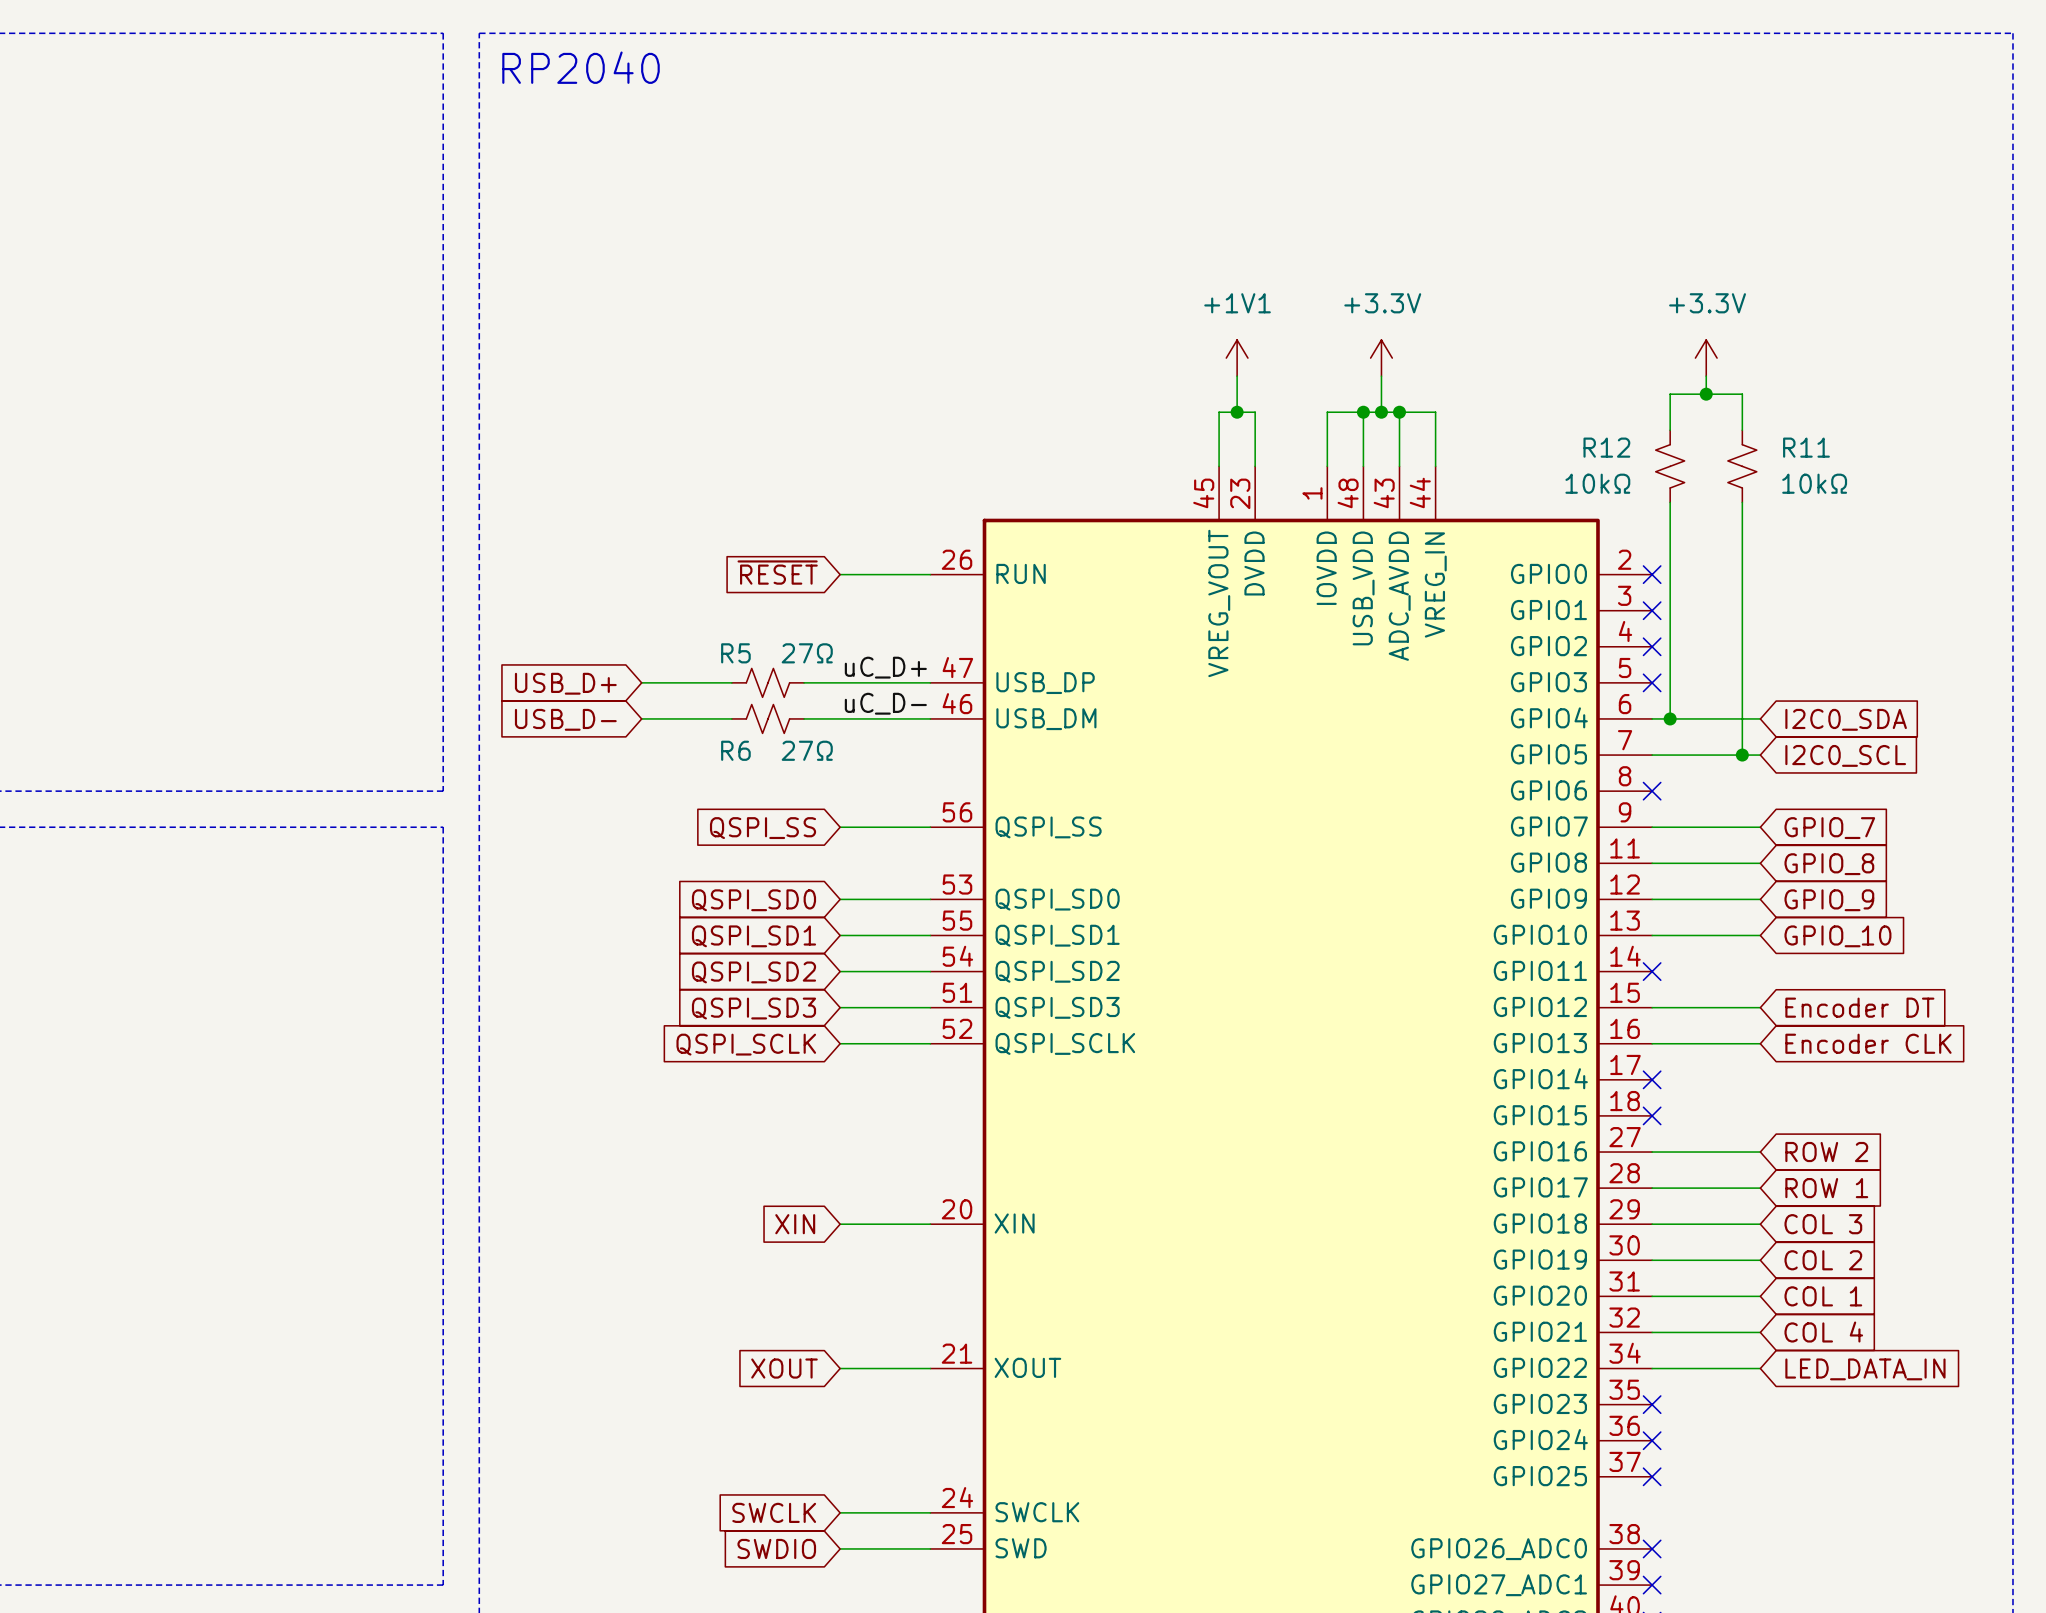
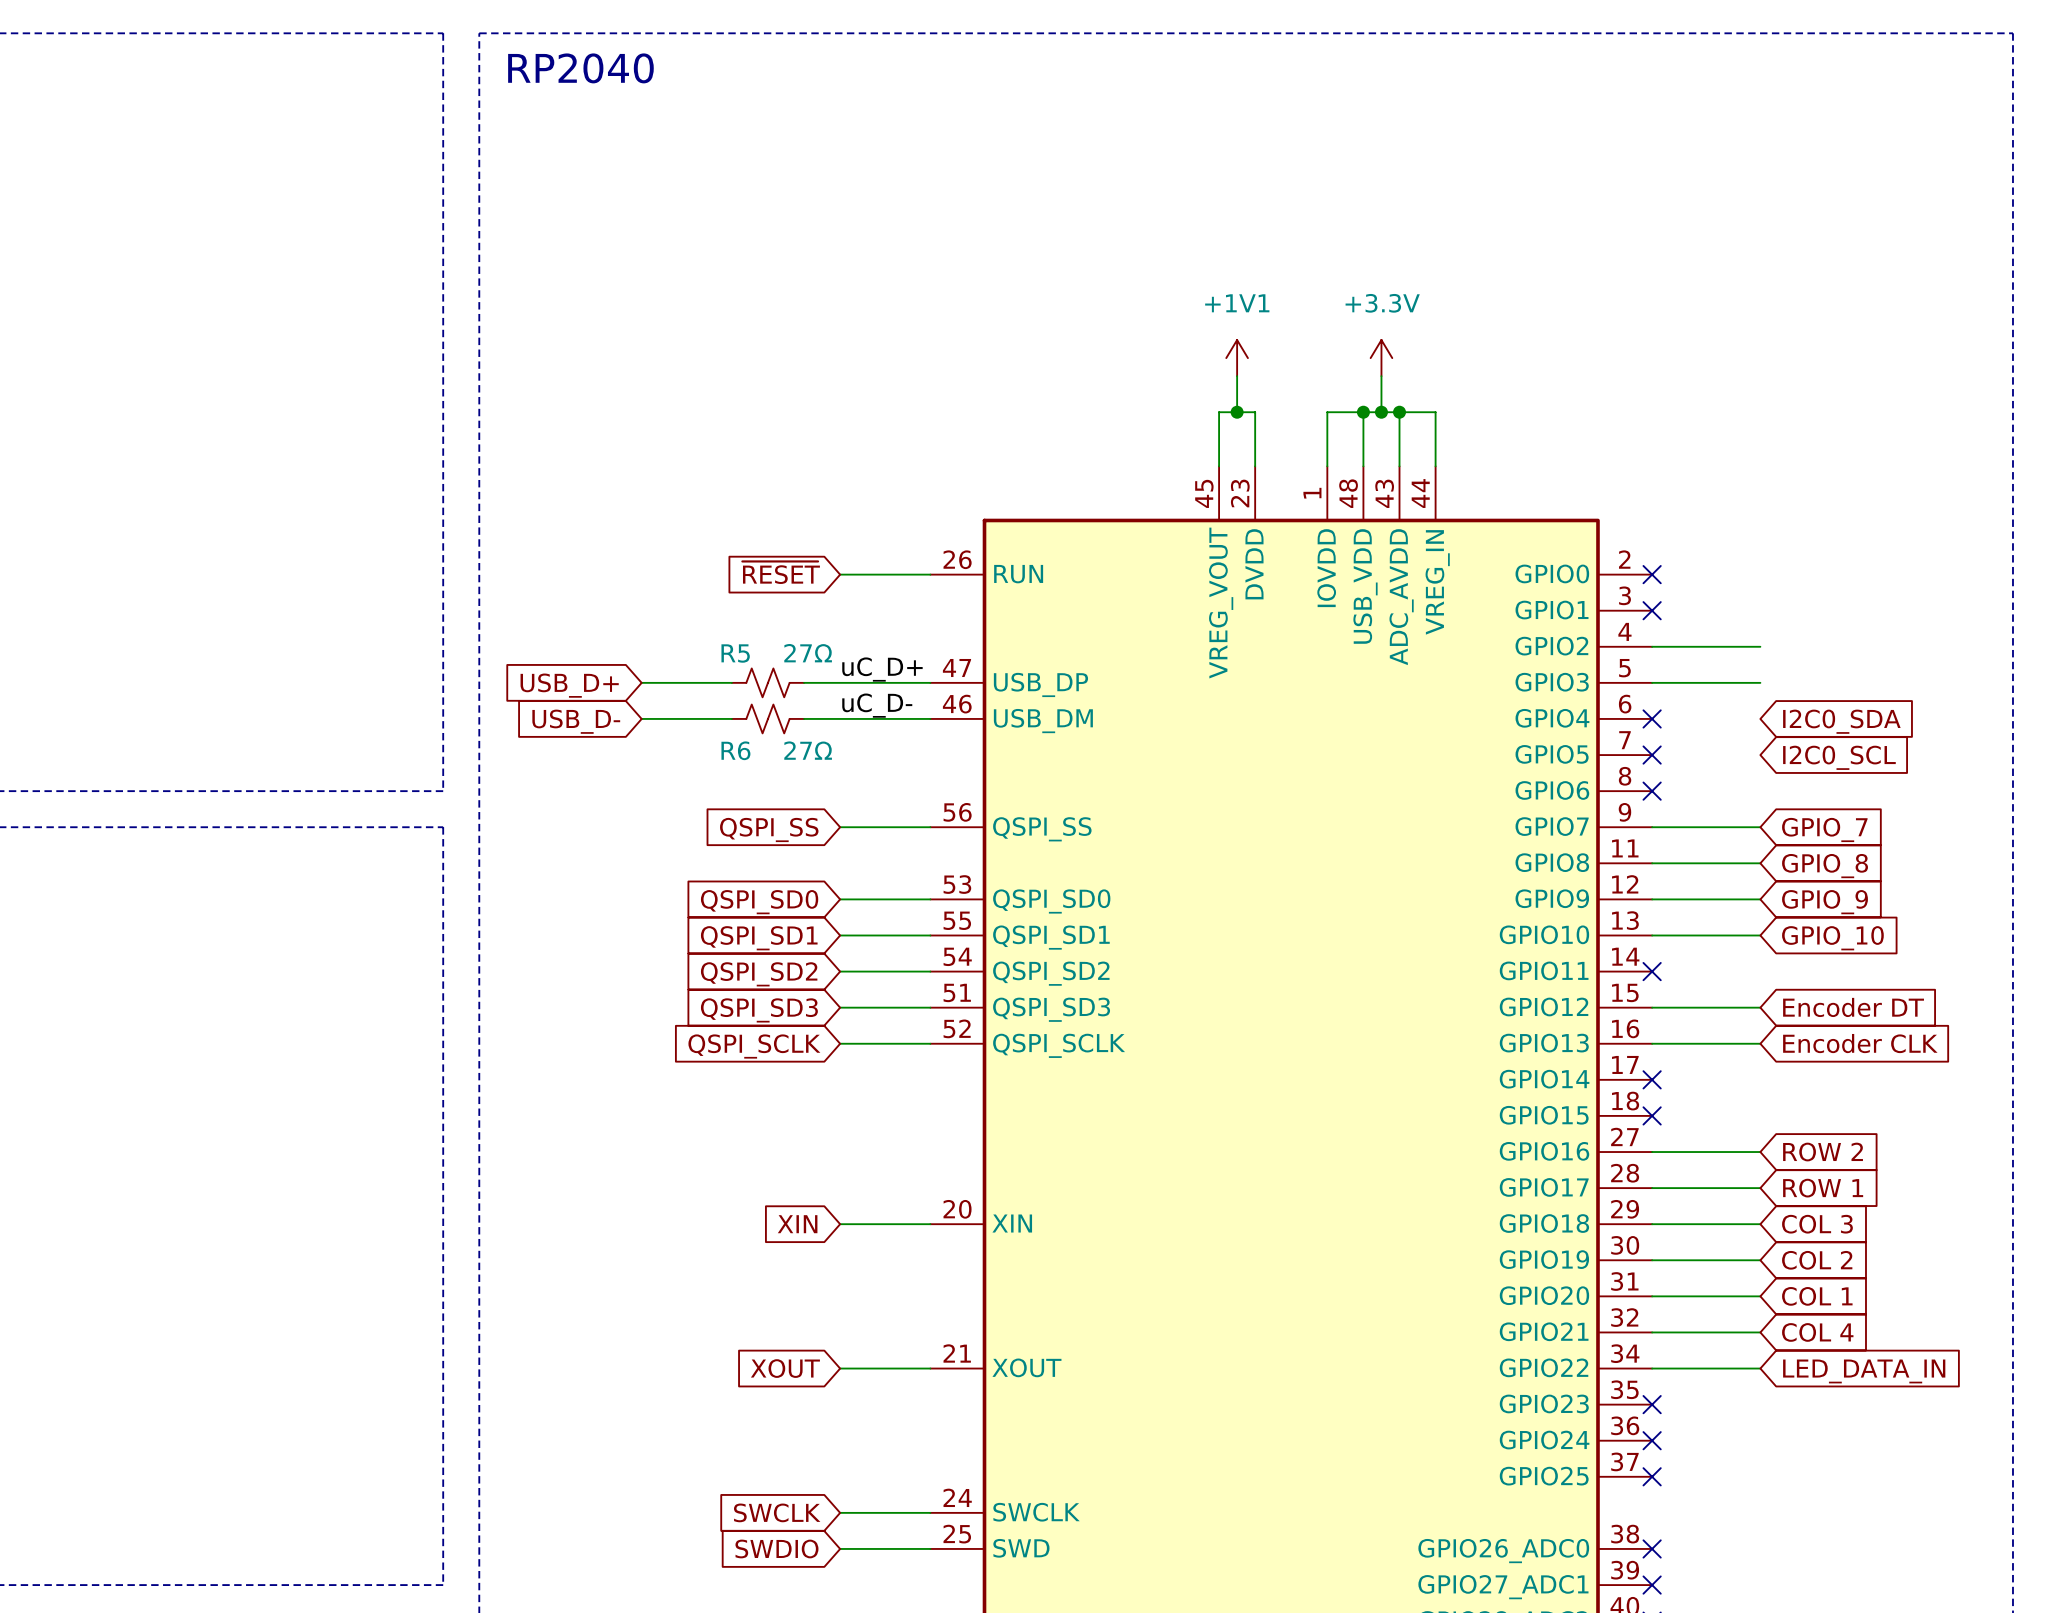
power symbol: +3.3V (1706, 358) -> none
wire: (1706, 376) (1706, 394) -> none
junction: (1706, 394) -> none
wire: (1670, 430) (1670, 394) (1742, 394) (1742, 430) -> none
R12: 10kΩ (1670, 466) -> none
R11: 10kΩ (1742, 466) -> none
wire: (1670, 502) (1670, 718) -> none
wire: (1742, 502) (1742, 755) -> none
no-connect mark: (1652, 646) -> none
no-connect mark: (1652, 682) -> none
wire: (1652, 718) (1760, 718) -> (1652, 646) (1760, 646)
no-connect mark: none -> (1652, 718)
junction: (1670, 718) -> none
wire: (1652, 755) (1760, 755) -> (1652, 682) (1760, 682)
no-connect mark: none -> (1652, 755)
junction: (1742, 755) -> none

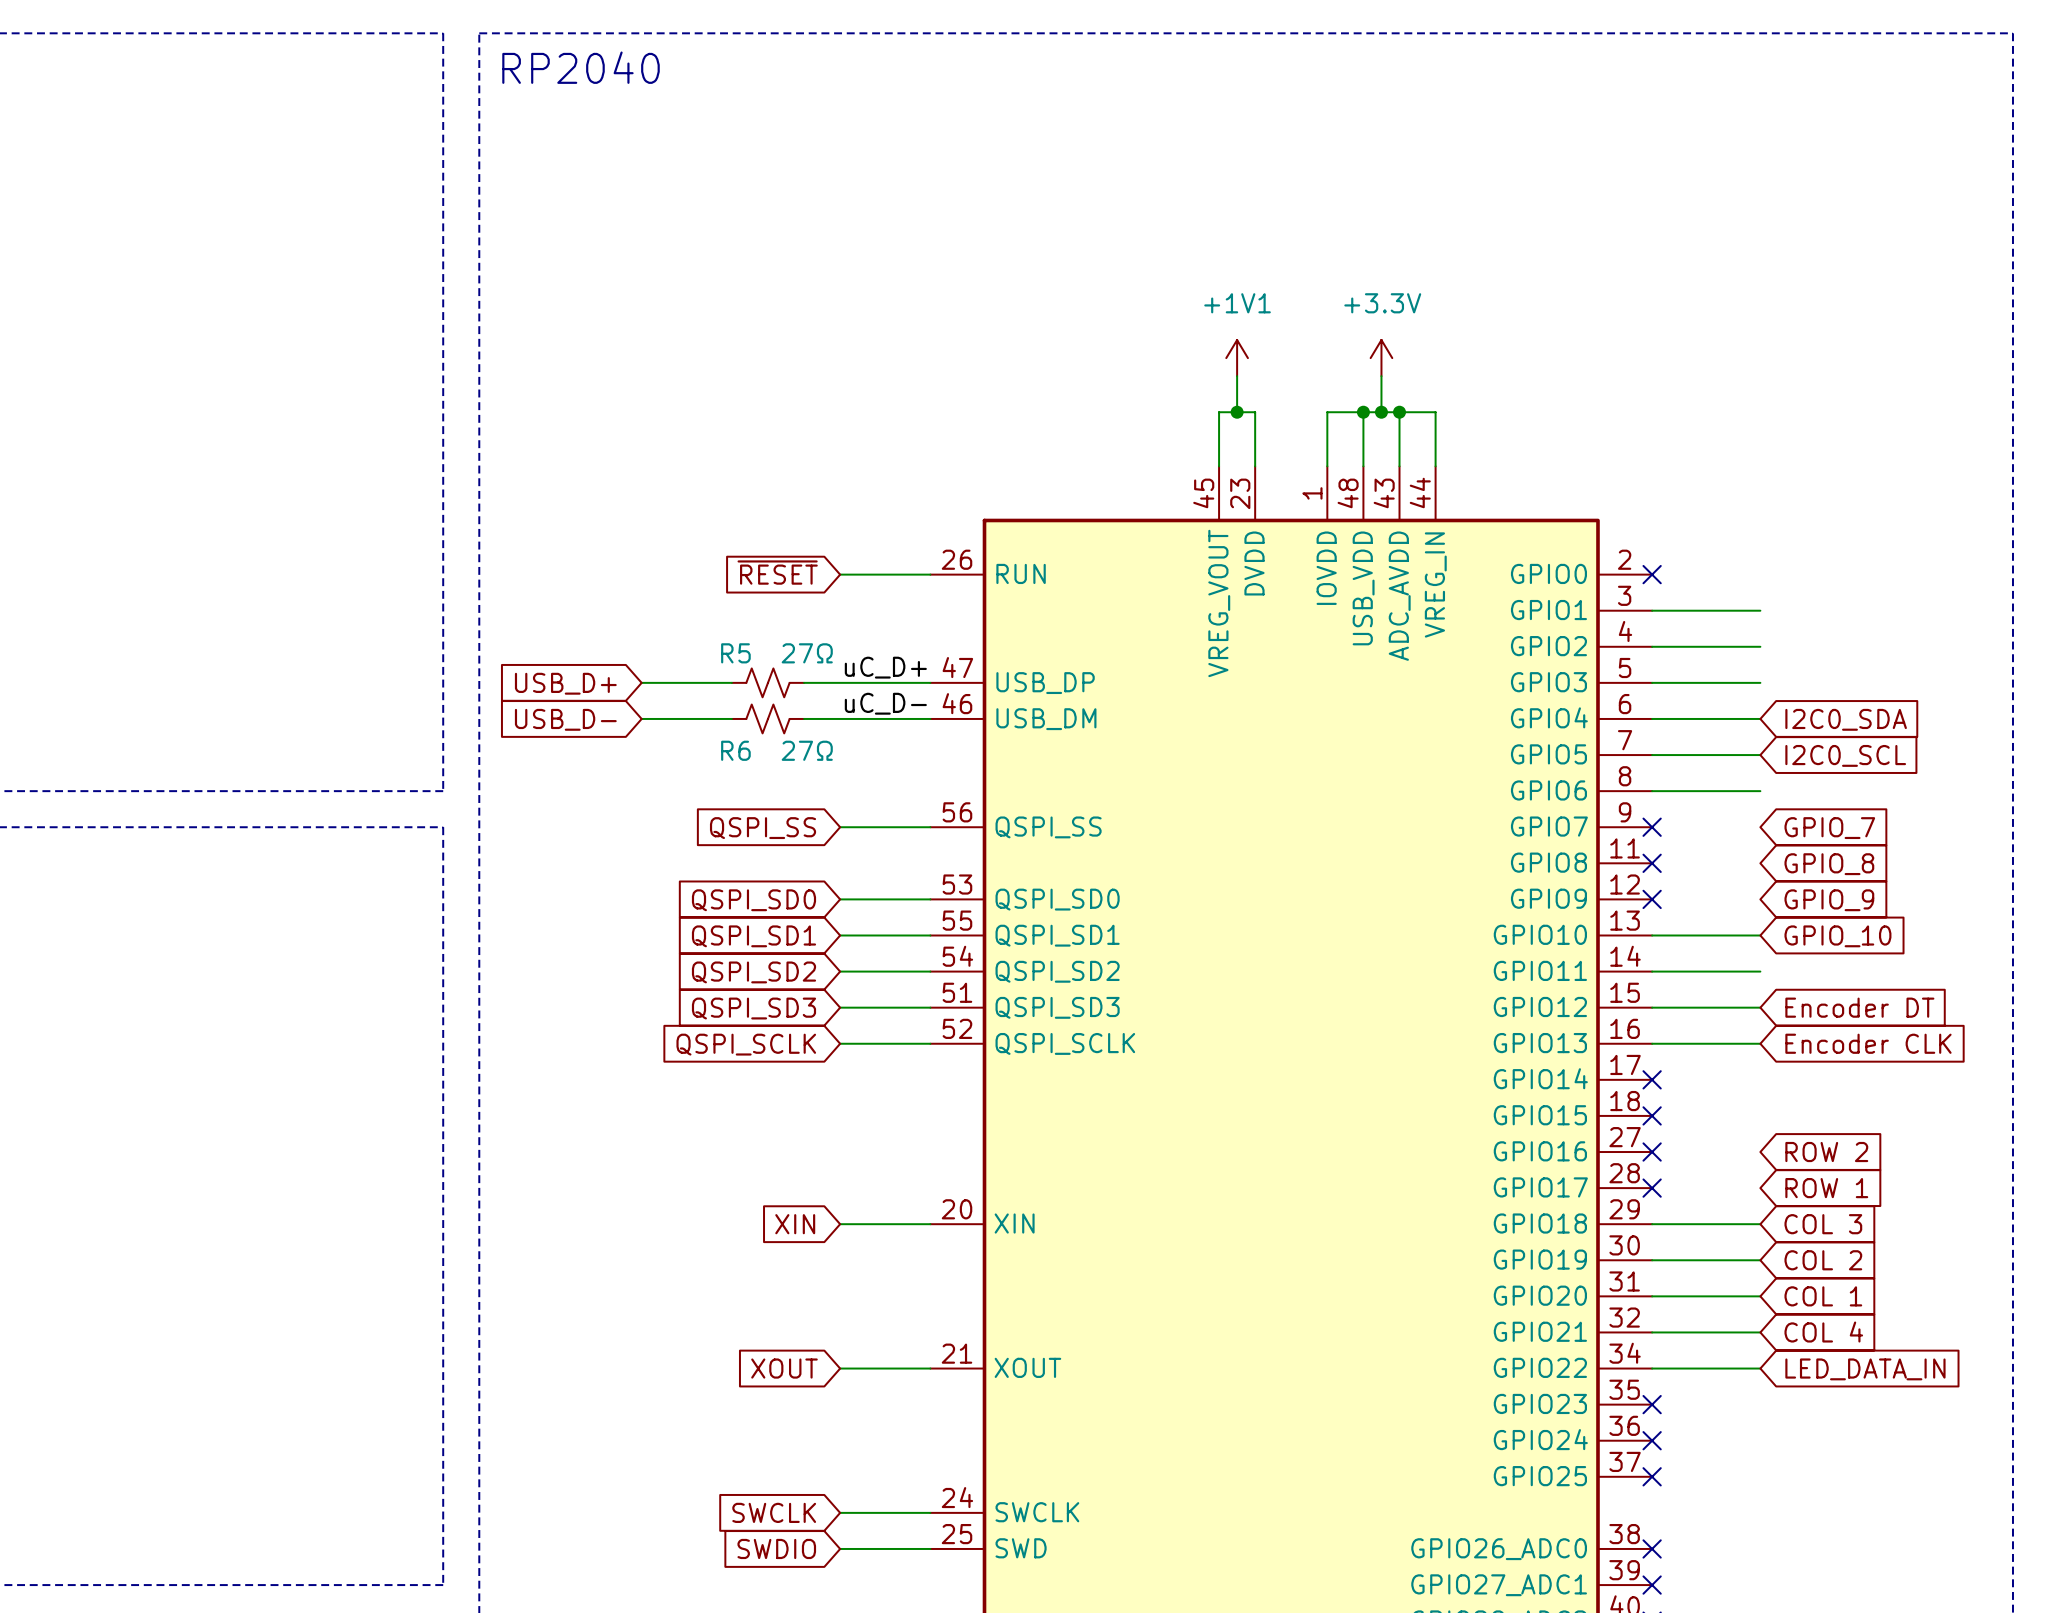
wire: none -> (1652, 610) (1760, 610)
no-connect mark: (1652, 610) -> none
no-connect mark: (1652, 718) -> none
no-connect mark: (1652, 755) -> none
no-connect mark: (1652, 791) -> none
wire: (1652, 827) (1760, 827) -> (1652, 718) (1760, 718)
no-connect mark: none -> (1652, 827)
wire: (1652, 863) (1760, 863) -> (1652, 755) (1760, 755)
no-connect mark: none -> (1652, 863)
wire: (1652, 899) (1760, 899) -> (1652, 791) (1760, 791)
no-connect mark: none -> (1652, 899)
no-connect mark: (1652, 971) -> none
wire: (1652, 1152) (1760, 1152) -> (1652, 971) (1760, 971)
no-connect mark: none -> (1652, 1152)
wire: (1652, 1188) (1760, 1188) -> none
no-connect mark: none -> (1652, 1188)

